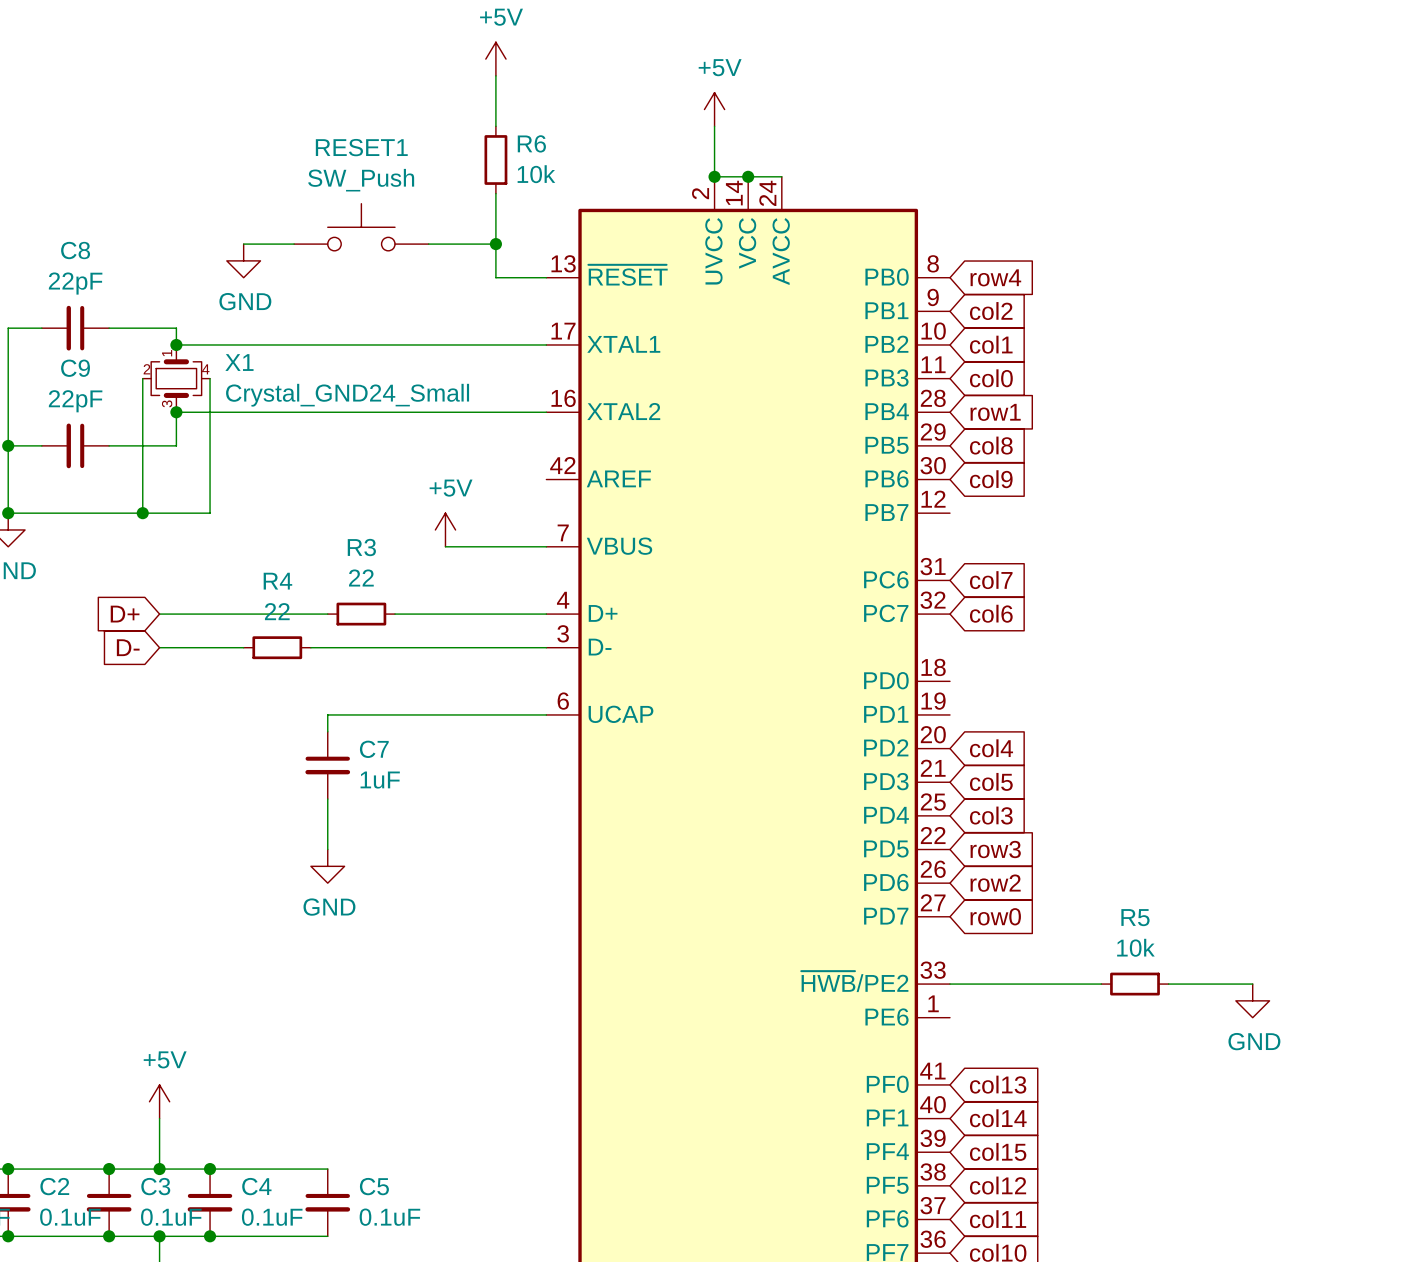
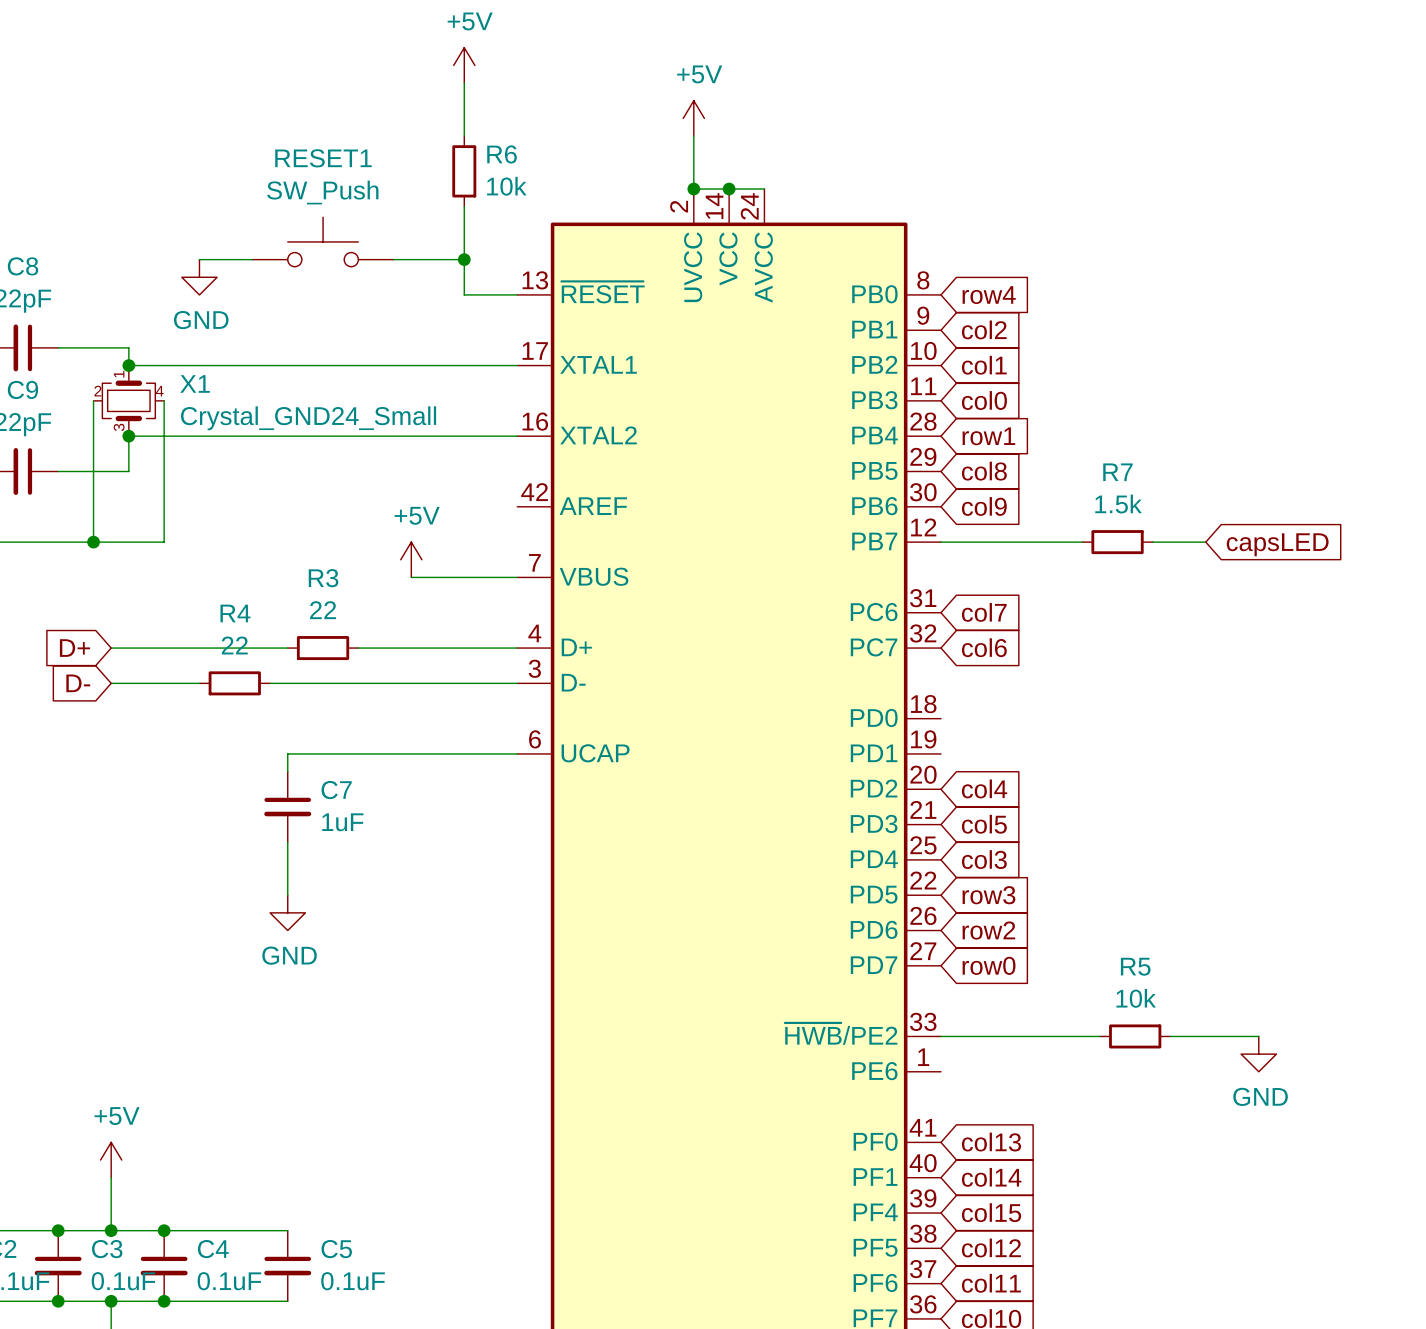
wire: none -> (940, 542) (1082, 542)
R7: none -> 1.5k (1117, 542)
wire: none -> (1152, 542) (1205, 542)
global label: none -> capsLED (1277, 544)

